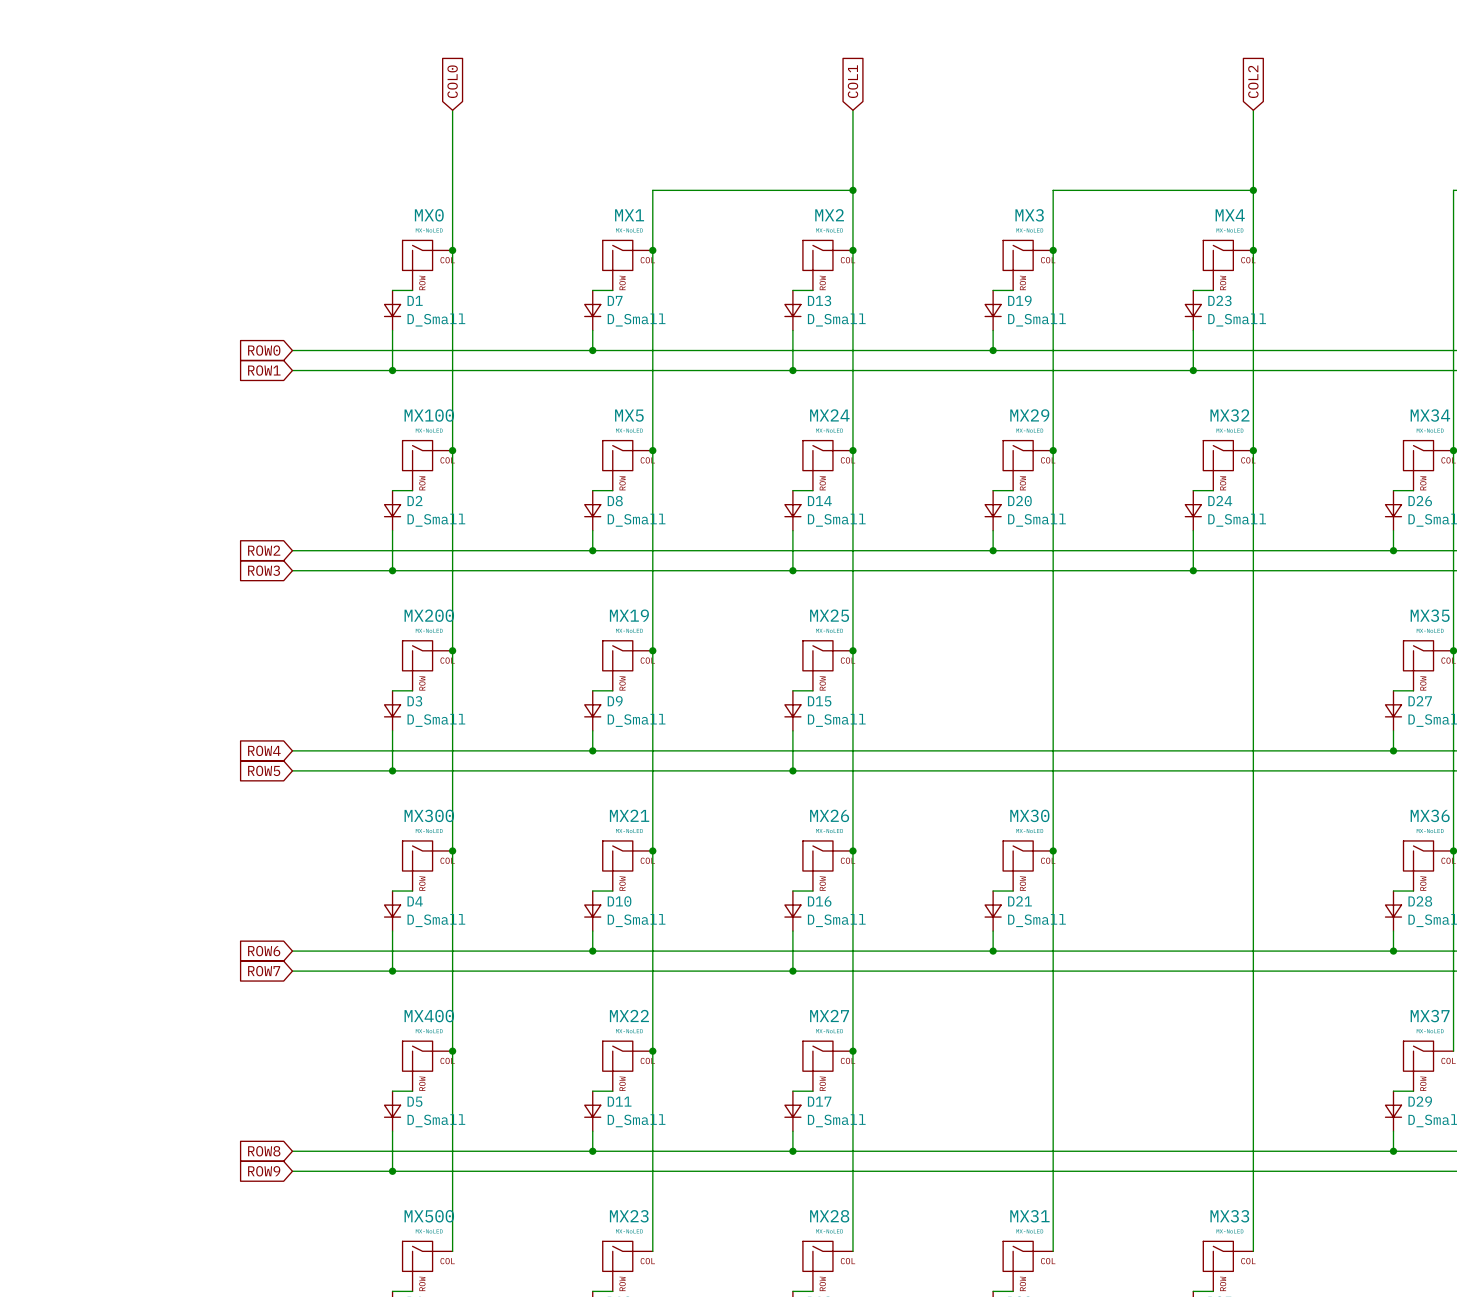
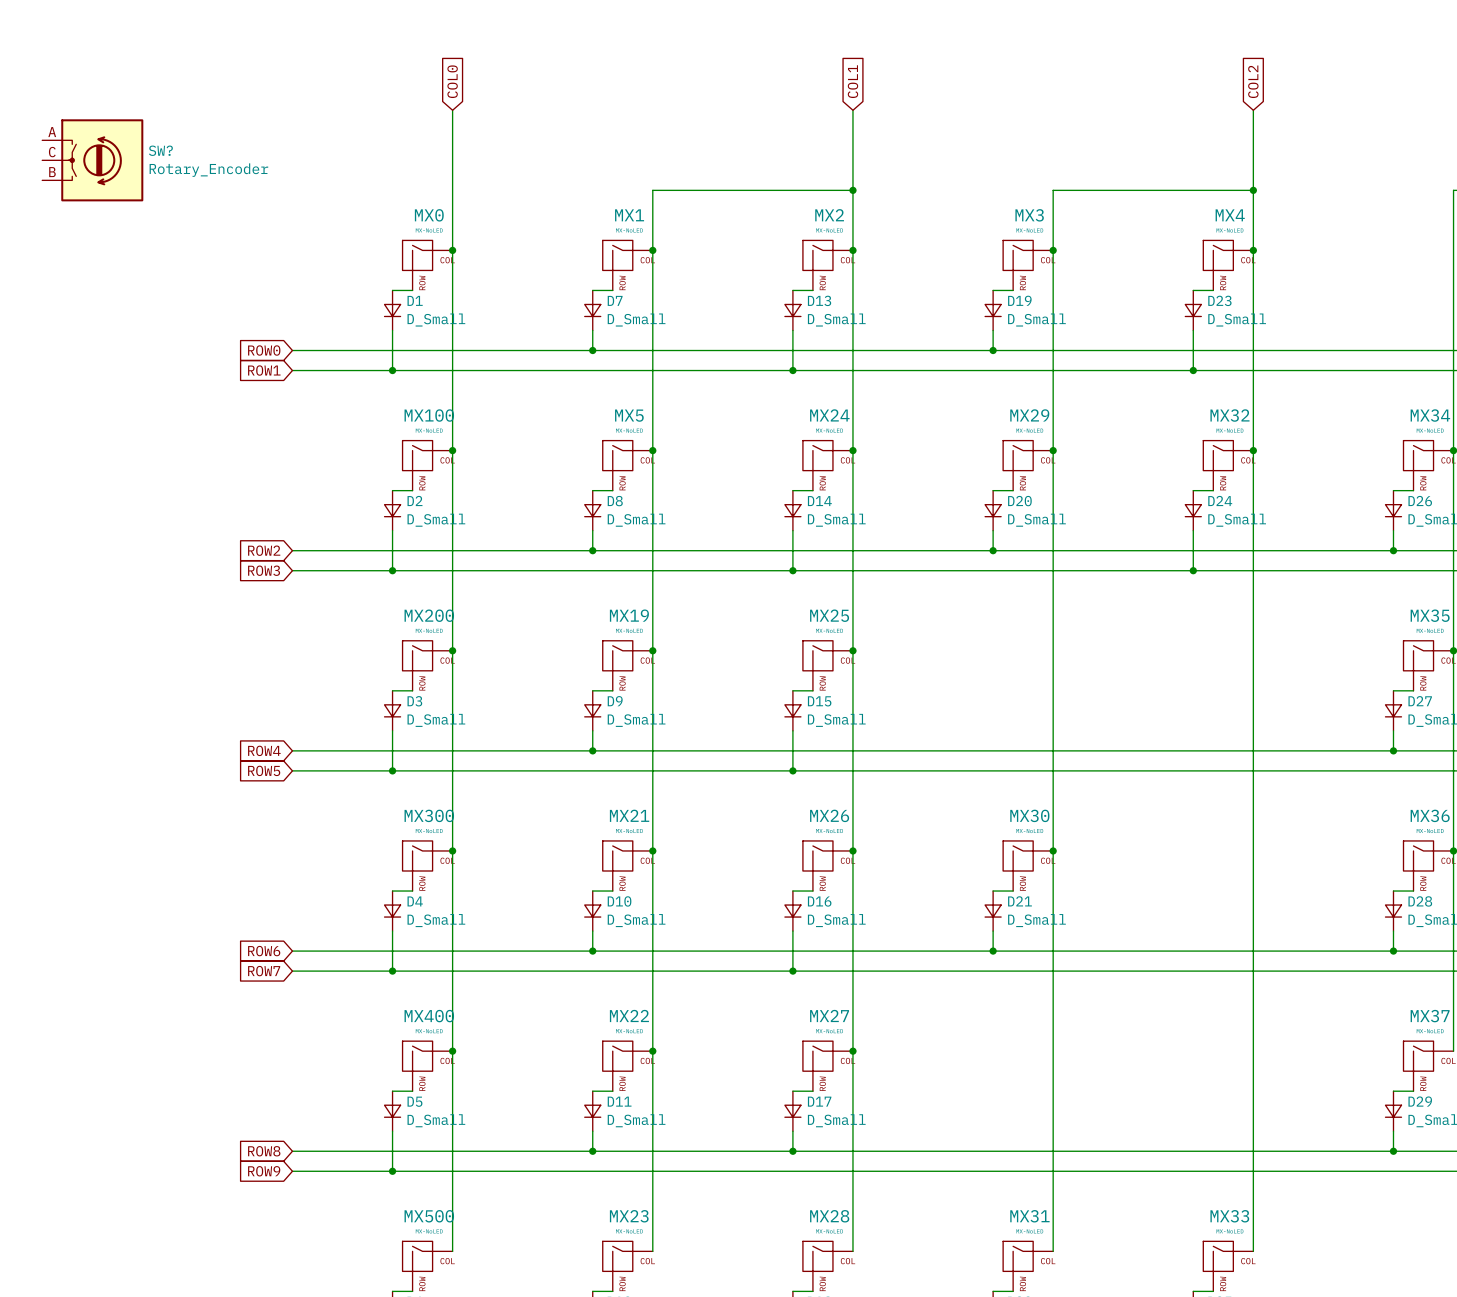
SW?: none -> Rotary_Encoder (92, 160)

